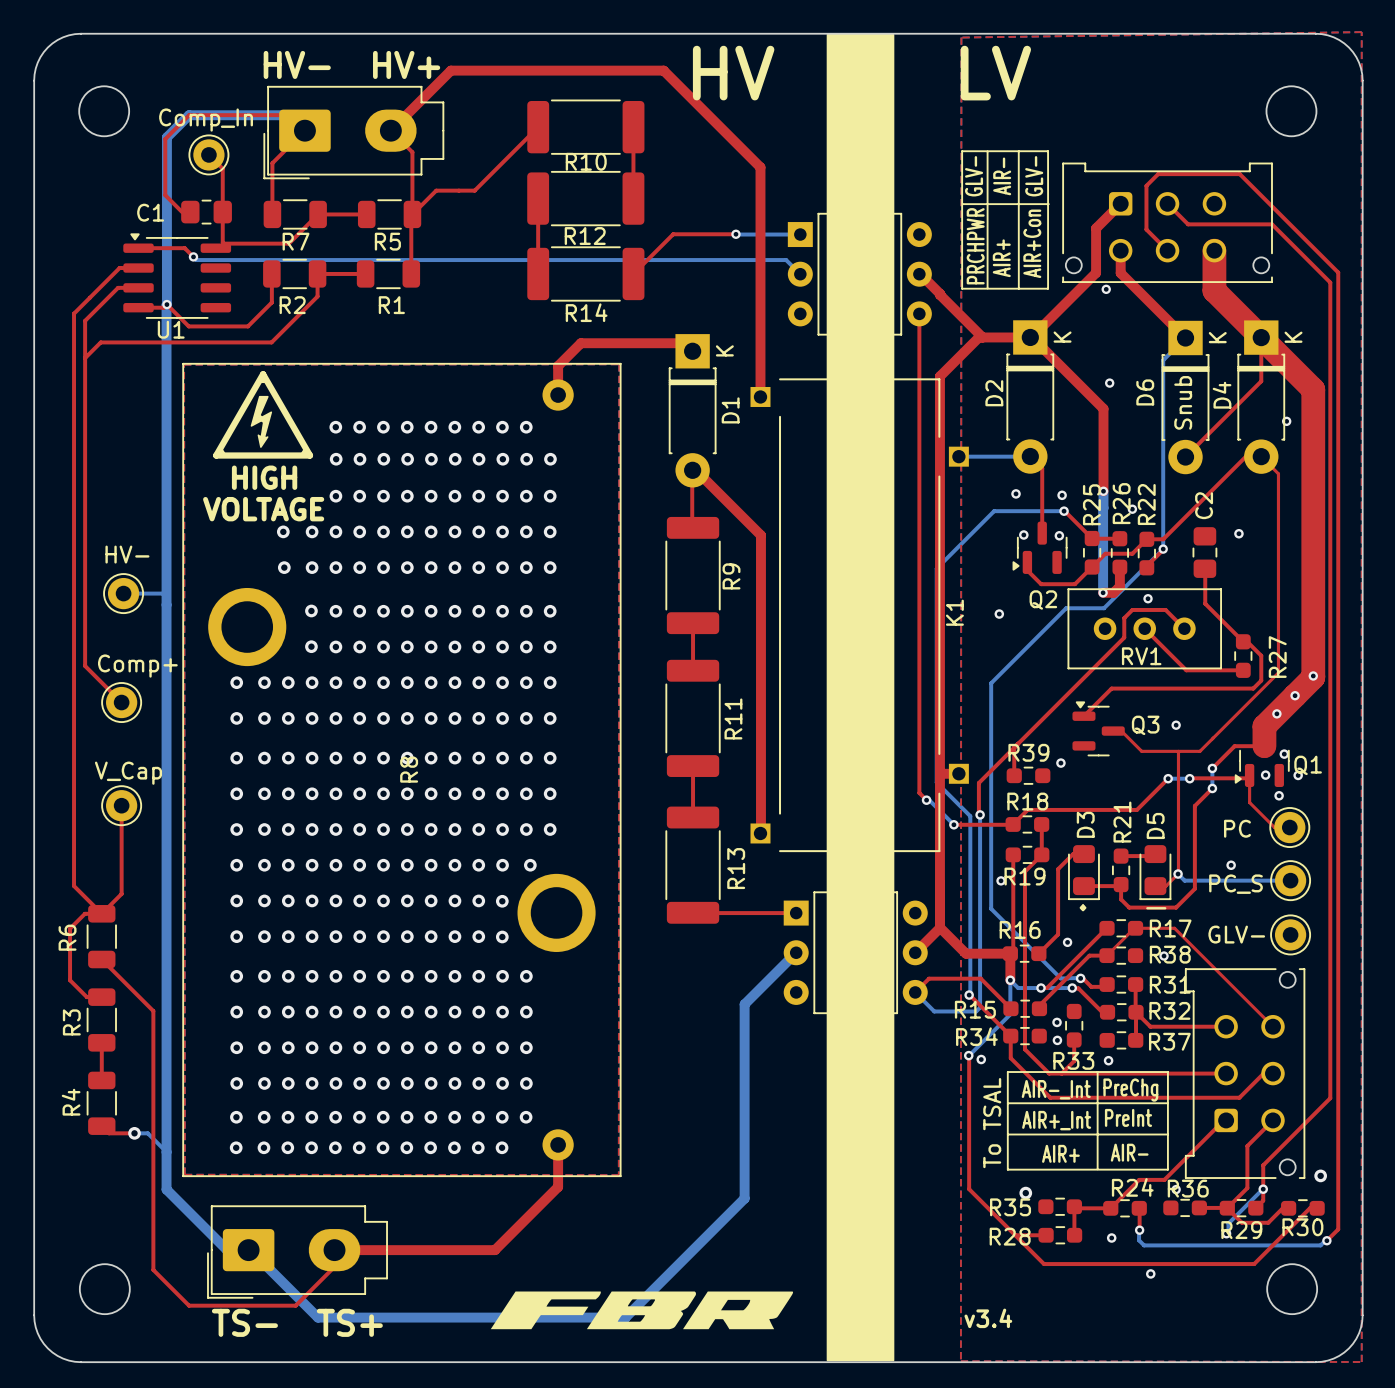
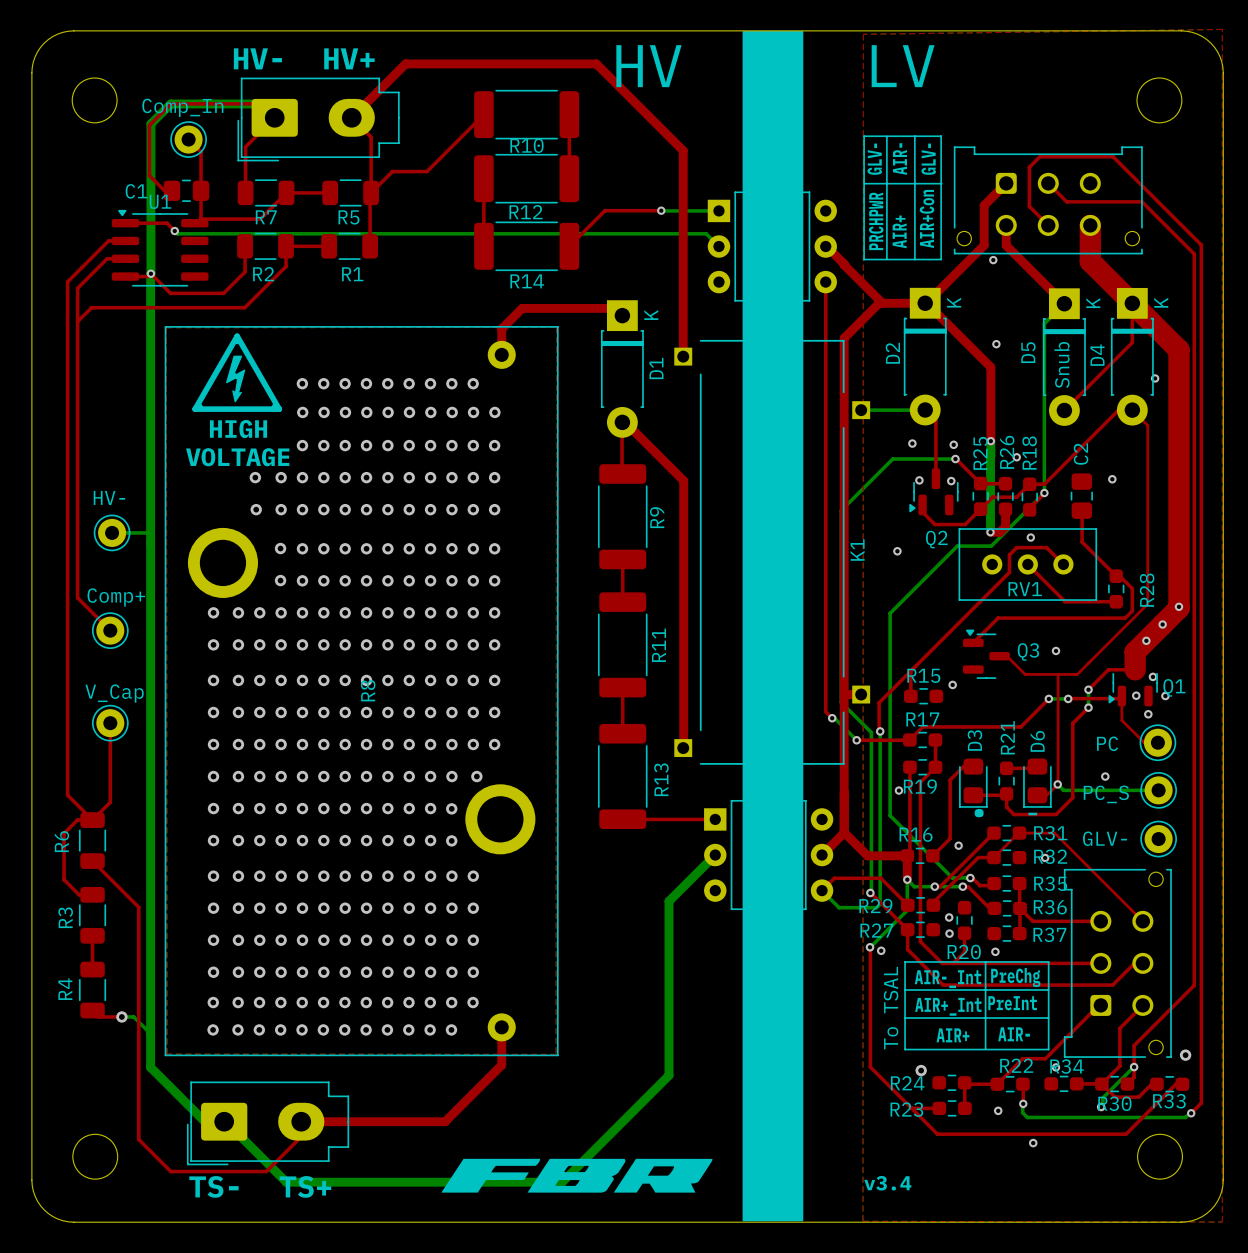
U1 name position: U1 (171, 329) -> U1 (160, 201)
D6 name: D6 (1145, 392) -> D5 (1028, 352)
R22 name: R22 (1146, 504) -> R18 (1029, 453)
R27 name: R27 (1277, 657) -> R28 (1147, 590)
R39 name: R39 (1028, 752) -> R15 (923, 675)
R18 name: R18 (1027, 801) -> R17 (922, 719)
D5 name: D5 (1155, 825) -> D6 (1037, 741)
R17 name: R17 (1170, 928) -> R31 (1050, 833)
R38 name: R38 (1170, 954) -> R32 (1050, 856)
R31 name: R31 (1170, 984) -> R35 (1050, 883)
R15 name: R15 (975, 1009) -> R29 (875, 906)
R32 name: R32 (1169, 1010) -> R36 (1050, 907)
R34 name: R34 (976, 1036) -> R27 (876, 930)
R33 name: R33 (1073, 1060) -> R20 (964, 952)
R24 name: R24 (1132, 1187) -> R22 (1016, 1065)
R36 name: R36 (1188, 1188) -> R34 (1067, 1066)
R35 name: R35 (1010, 1207) -> R24 (907, 1083)
R30 name: R30 (1302, 1227) -> R33 (1169, 1101)
R29 name: R29 (1241, 1230) -> R30 (1114, 1103)
R28 name: R28 (1010, 1236) -> R23 (906, 1109)

